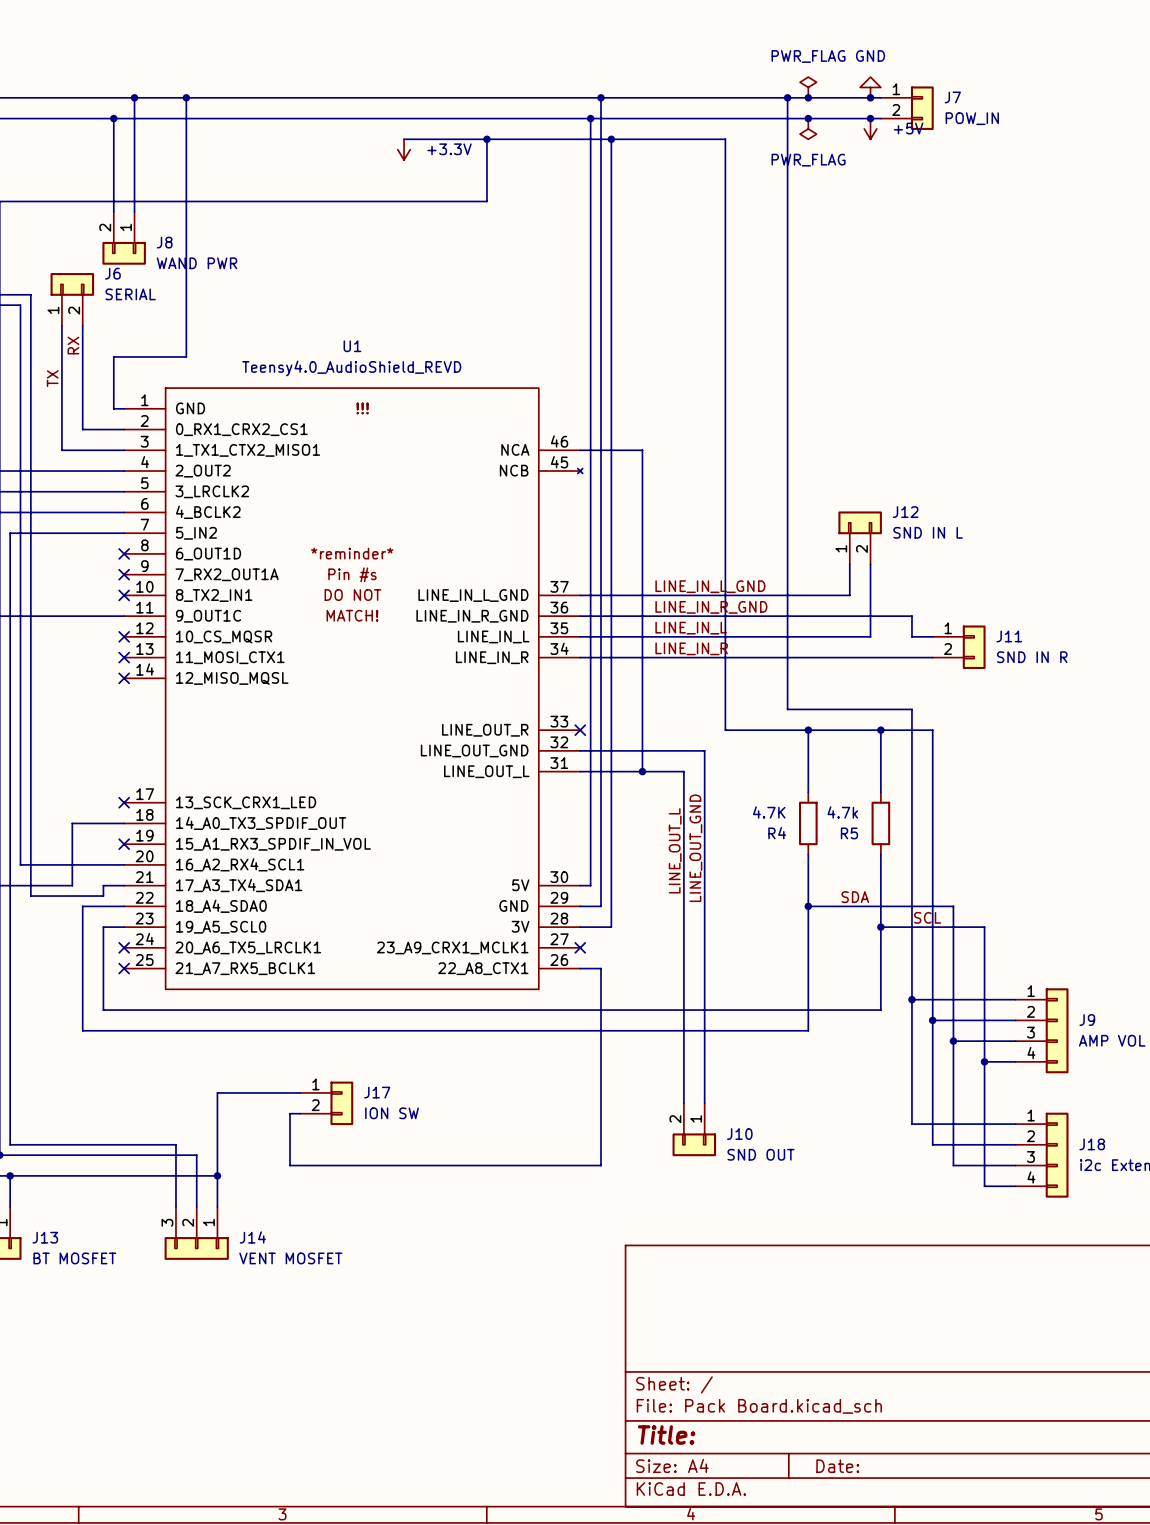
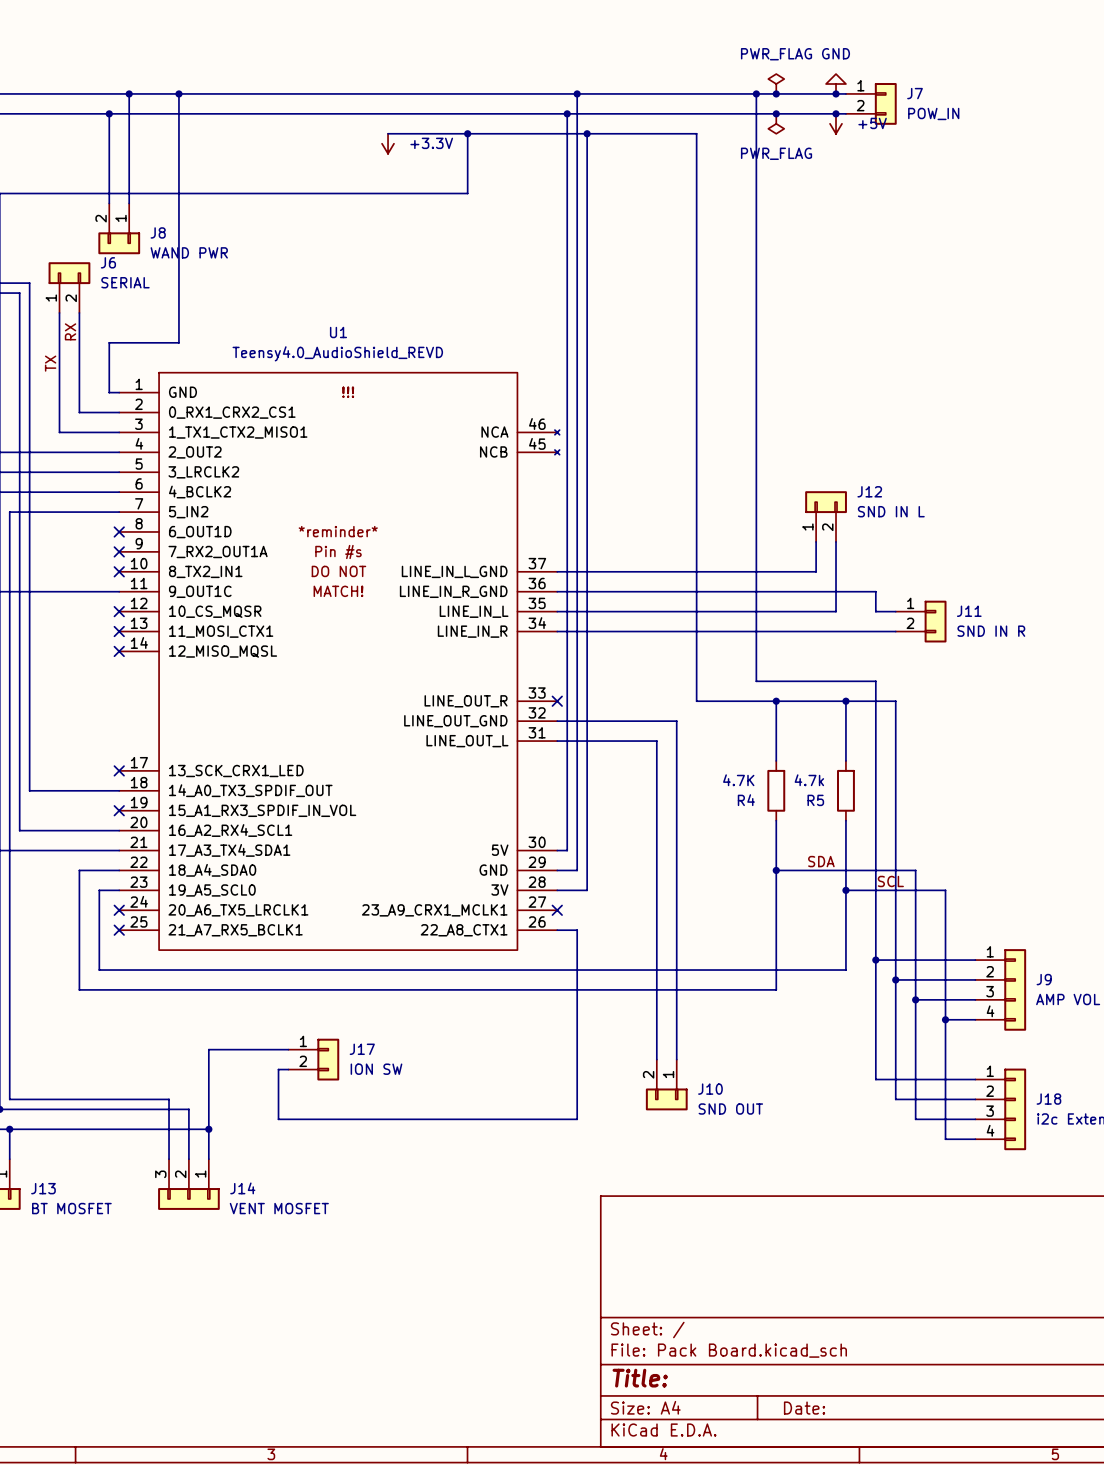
U1 symbol: [124, 388, 583, 990] -> [119, 372, 560, 951]
wire: (580, 450) (642, 450) (642, 771) -> none
label: LINE_IN_L_GND (710, 586) -> none
label: LINE_IN_R_GND (711, 607) -> none
label: LINE_IN_L (691, 628) -> none
label: LINE_IN_R (691, 648) -> none
junction: (642, 771) -> none
wire: (30, 823) (30, 896) (103, 896) (103, 885) -> (29, 790) (69, 790)
wire: (72, 823) (72, 885) -> (99, 850) (69, 850)
label: LINE_OUT_GND (695, 848) -> none
label: LINE_OUT_L (675, 850) -> none

